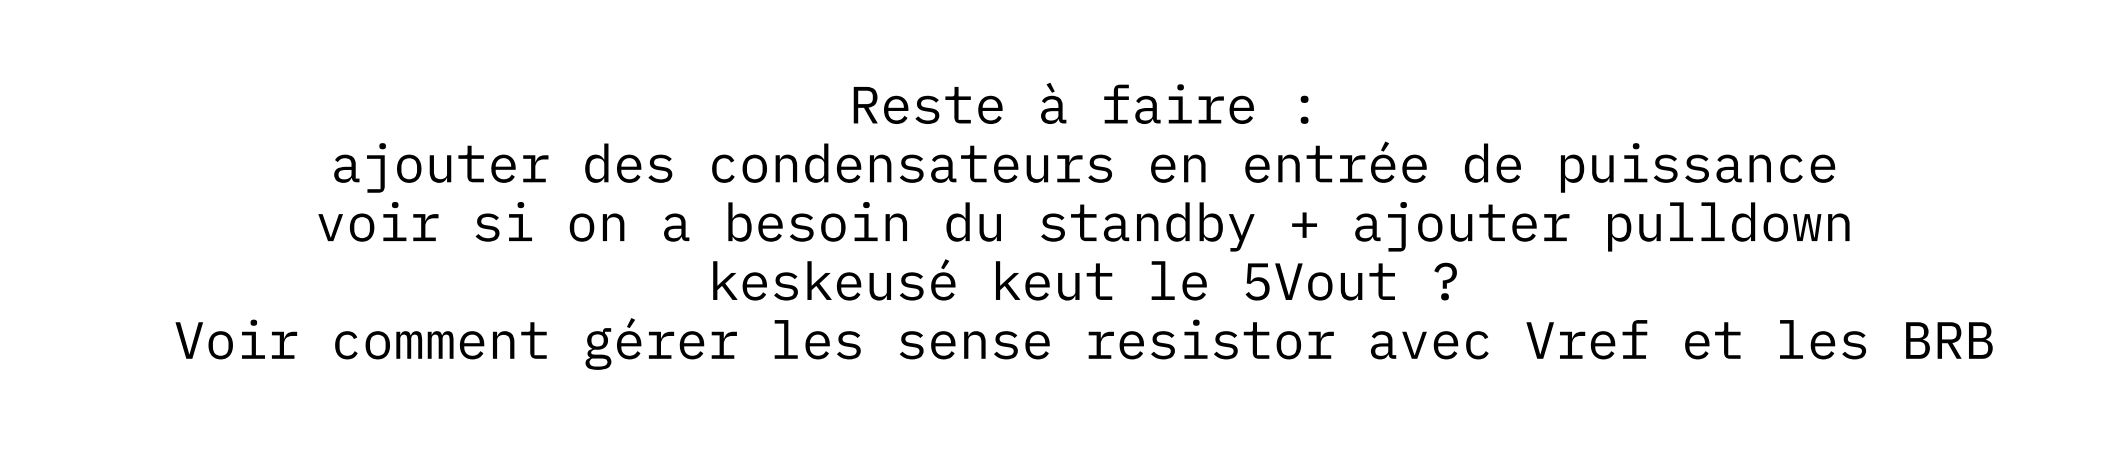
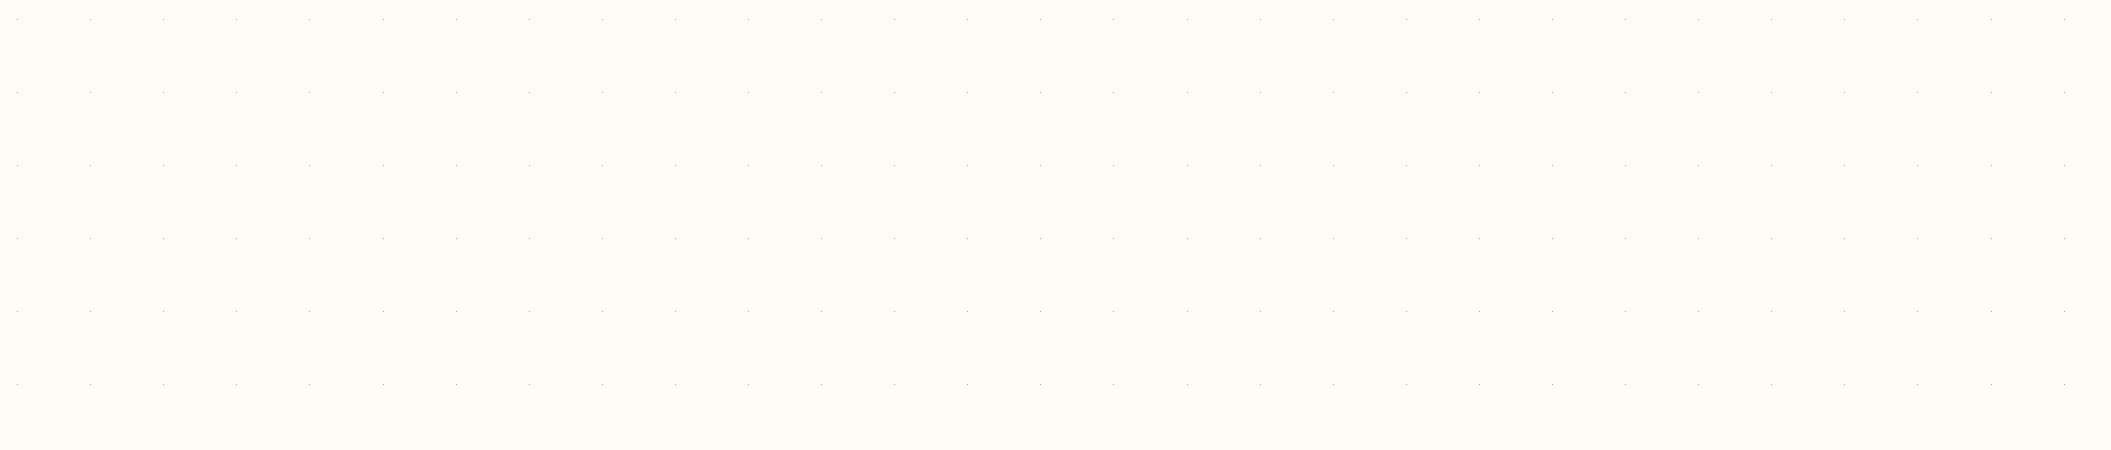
text: Reste à faire : (1081, 103) -> none
text: ajouter des condensateurs en entrée de puissance (1084, 167) -> none
text: voir si on a besoin du standby + ajouter pulldown (1083, 226) -> none
text: keskeusé keut le 5Vout ? (1085, 279) -> none
text: Voir comment gérer les sense resistor avec Vref et les BRB (1084, 343) -> none

